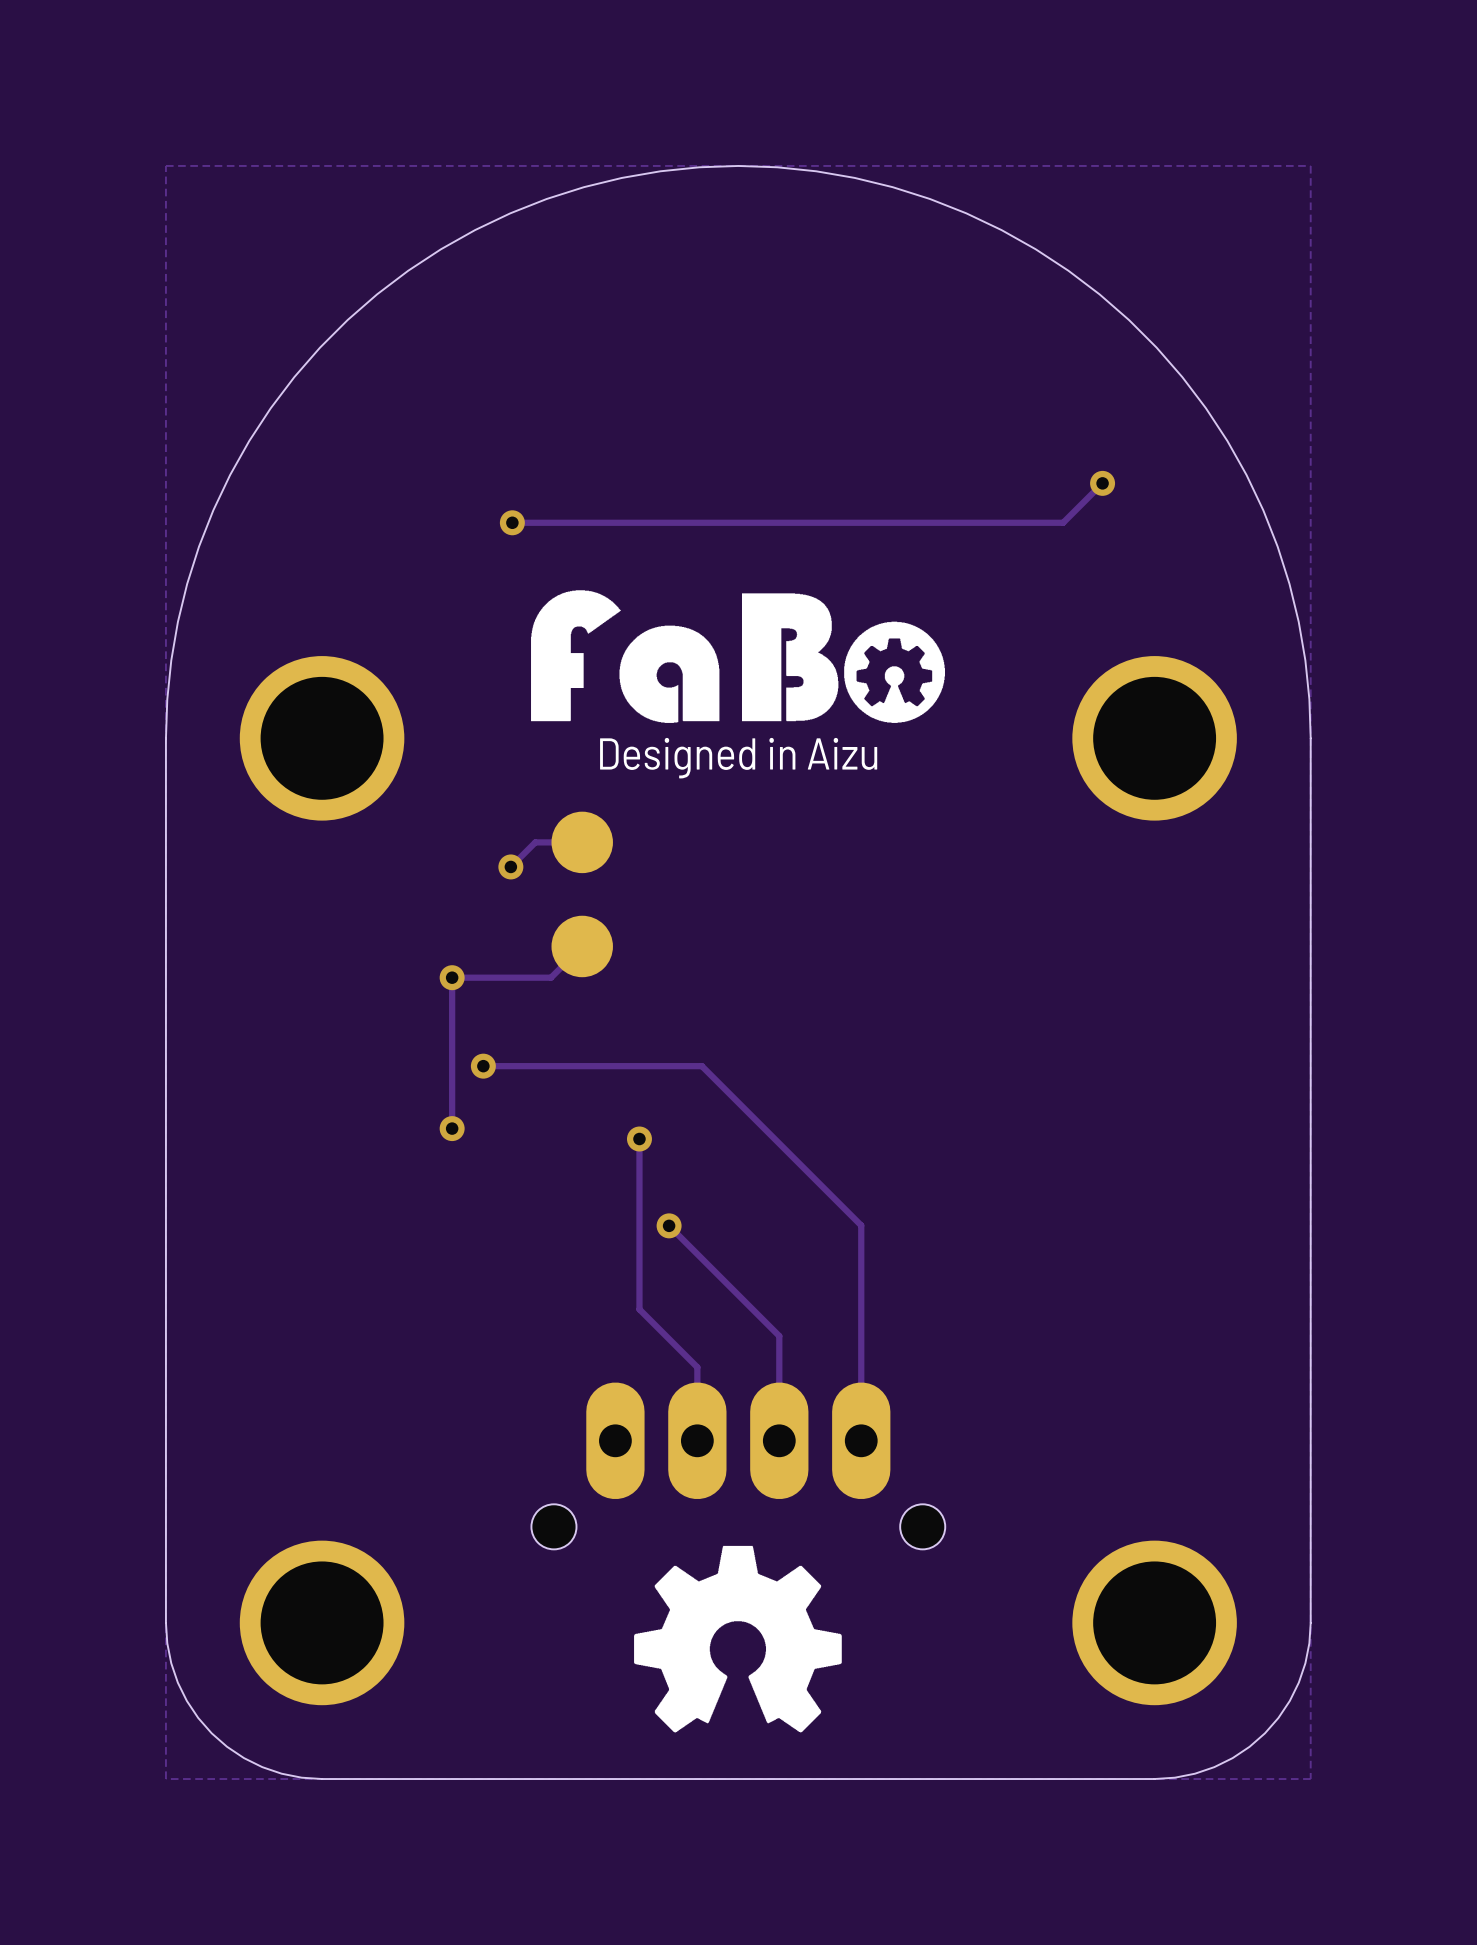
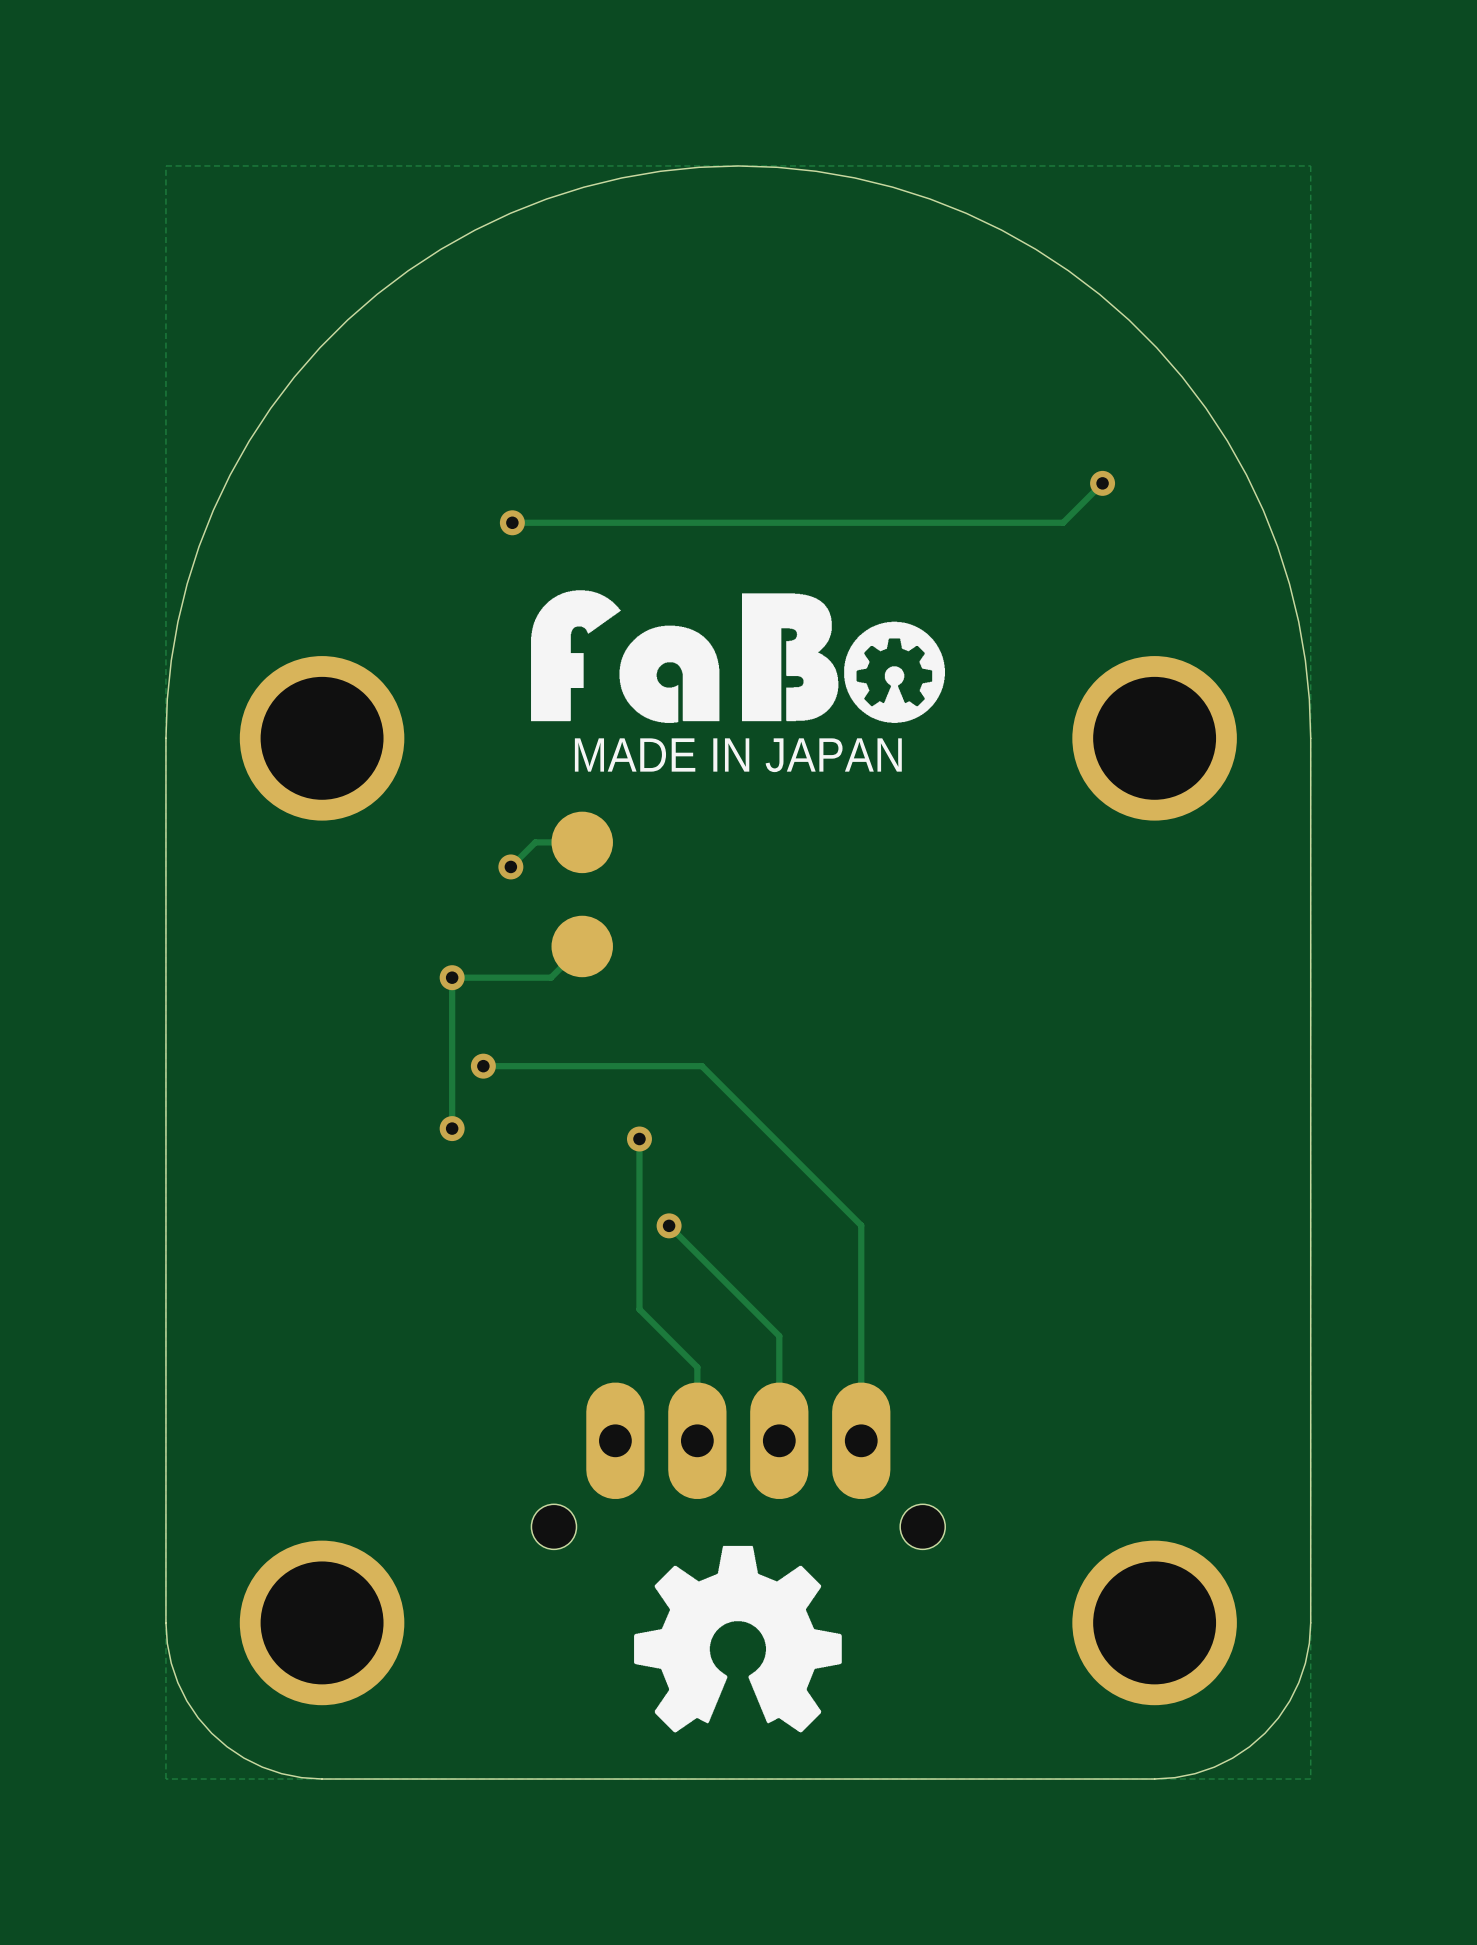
text: Designed in Aizu (738, 758) -> MADE IN JAPAN (738, 755)

